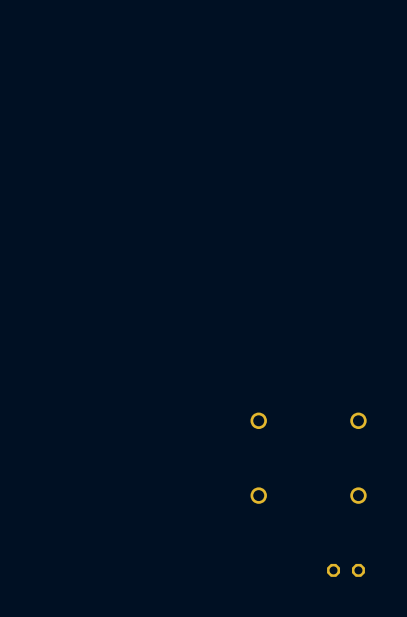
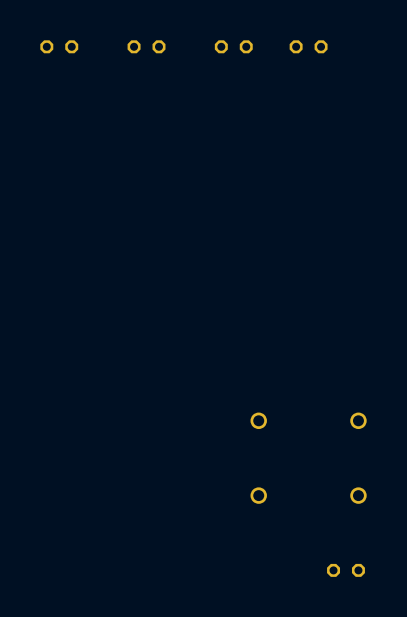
part: none -> (59, 46)
part: none -> (146, 46)
part: none -> (233, 46)
part: none -> (308, 46)

